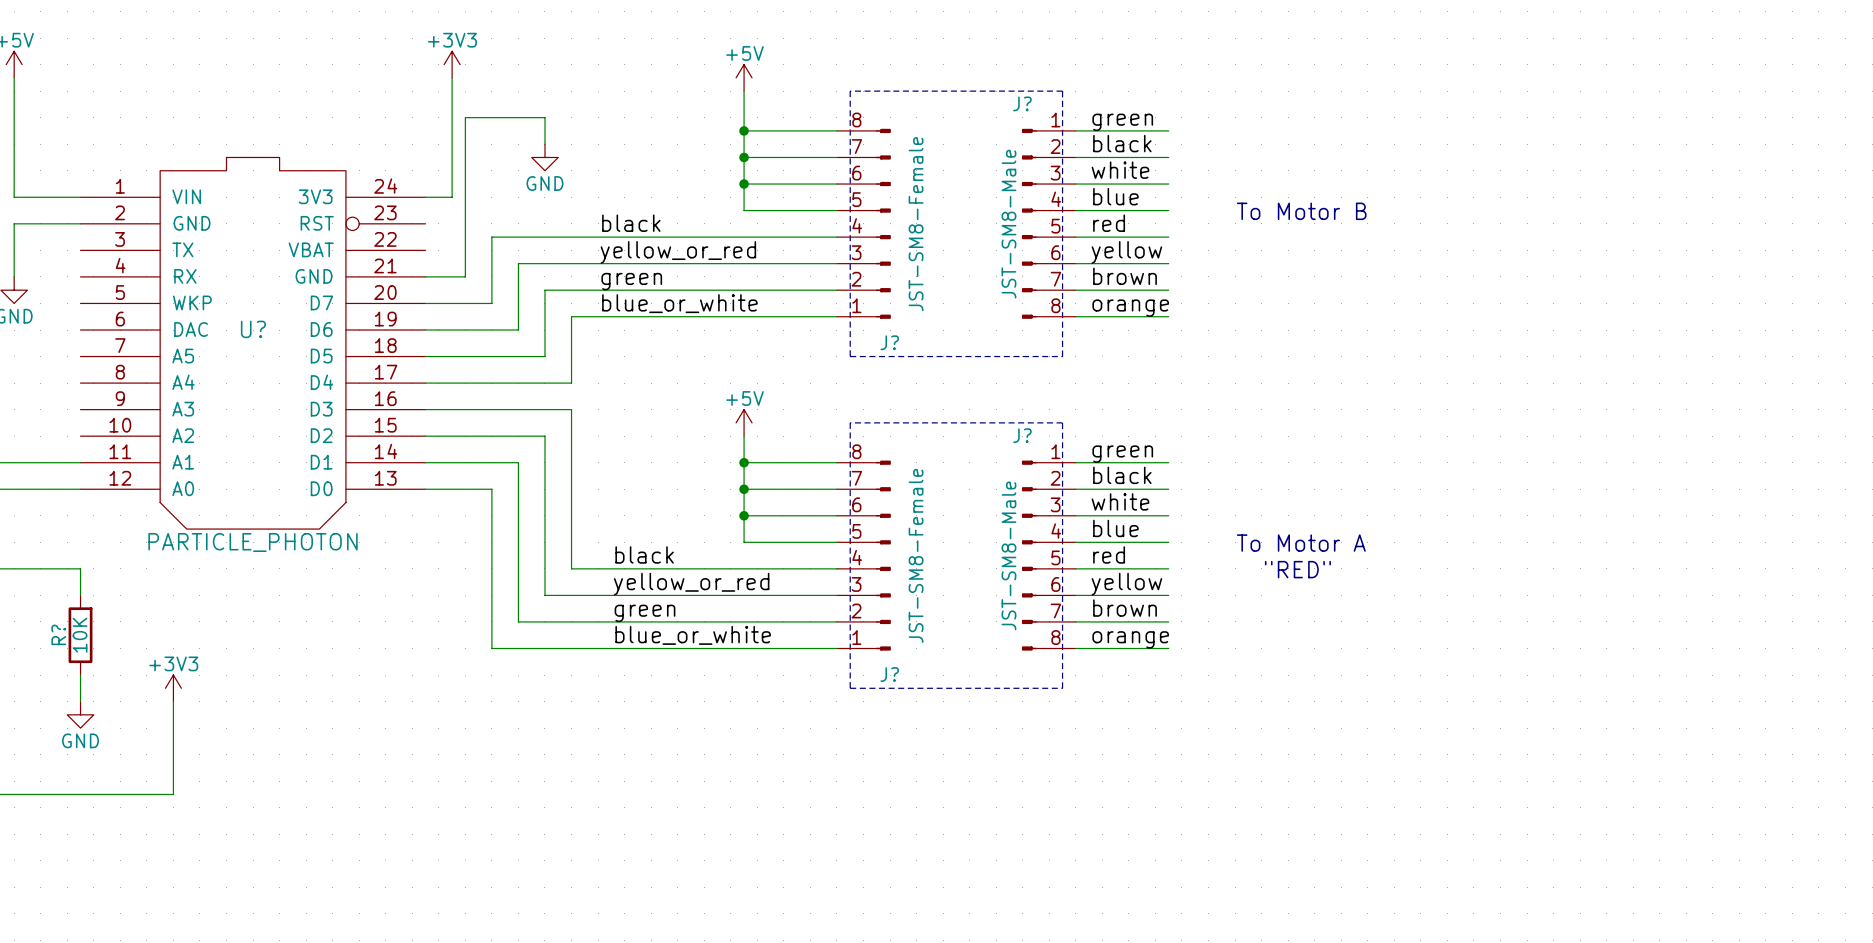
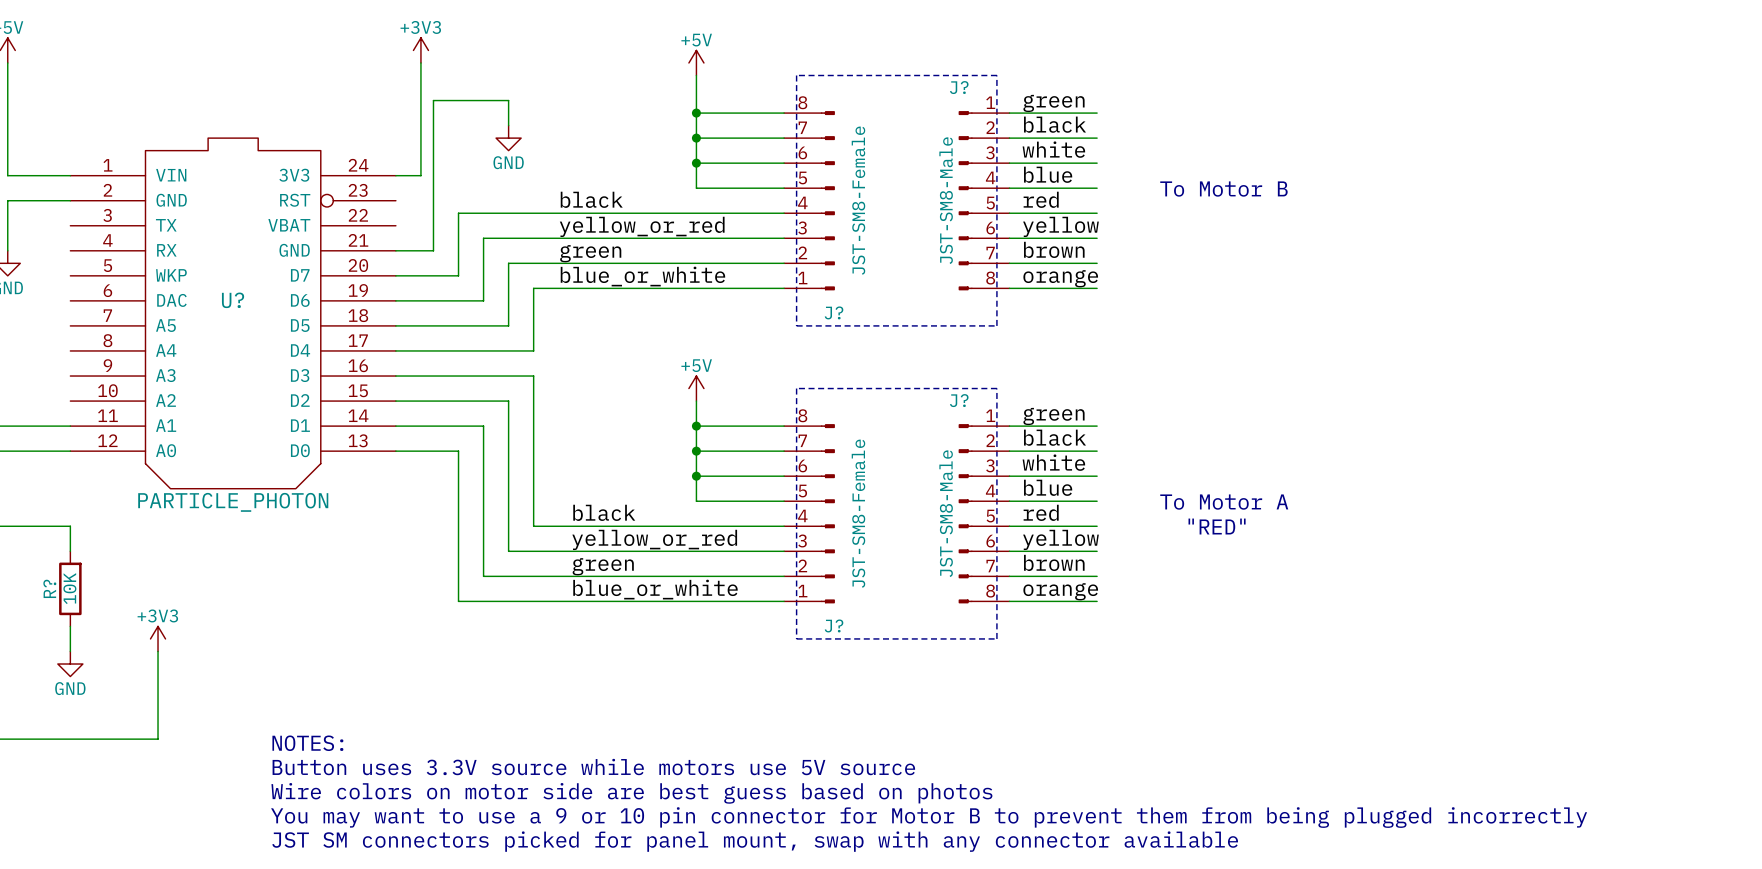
text: none -> NOTES: (307, 743)
text: none -> Button uses 3.3V source while motors use 5V source (593, 767)
text: none -> Wire colors on motor side are best guess based on photos (631, 793)
text: none -> You may want to use a 9 or 10 pin connector for Motor B to prevent them from being plugged incorrectly (929, 817)
text: none -> JST SM connectors picked for panel mount, swap with any connector available (755, 841)

